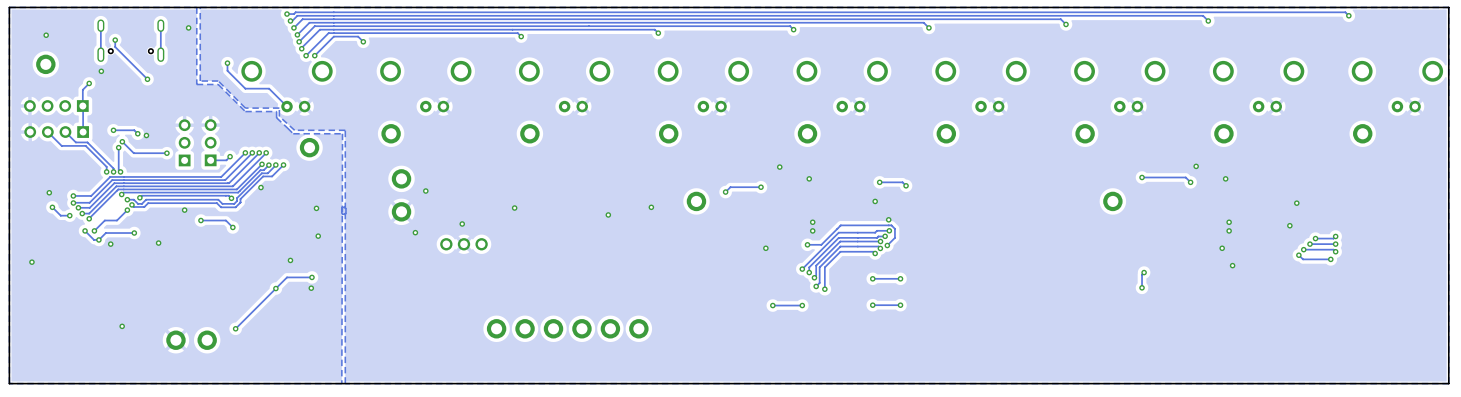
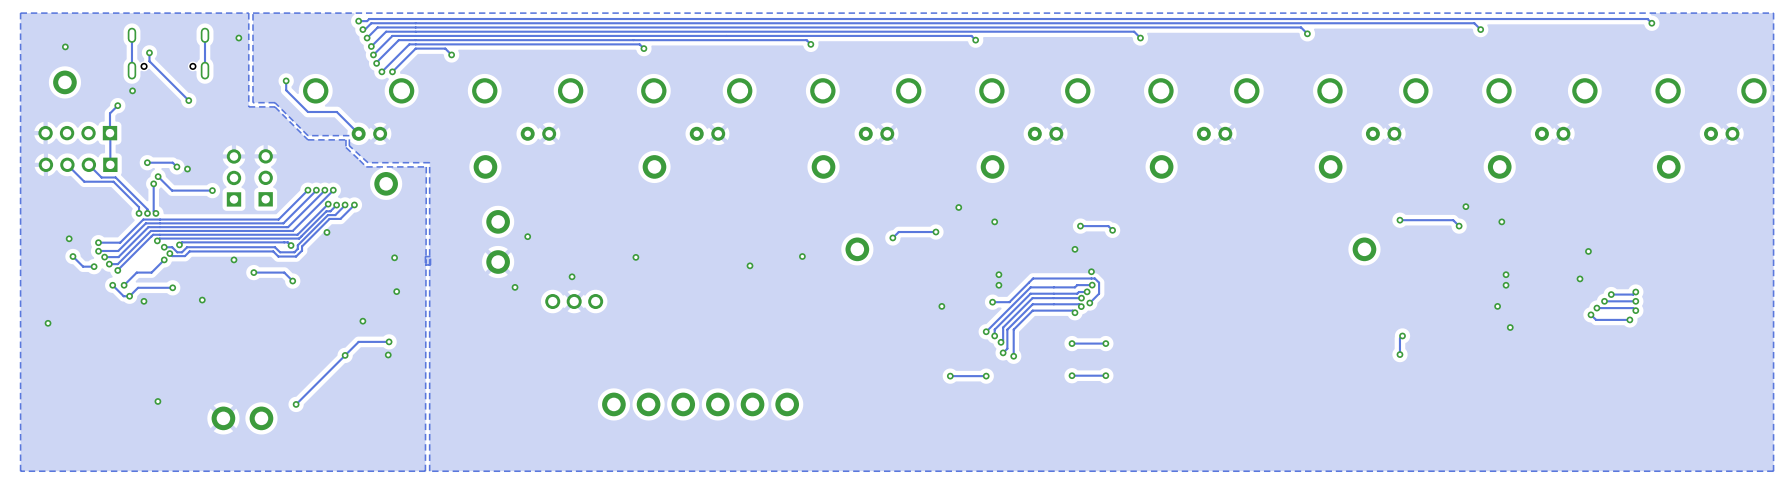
board edge: (1448, 7) (1448, 383) (9, 383) (9, 7) (1448, 7) -> none
track: (230, 156) (226, 160) (210, 160) -> none
via: (230, 156) -> none

